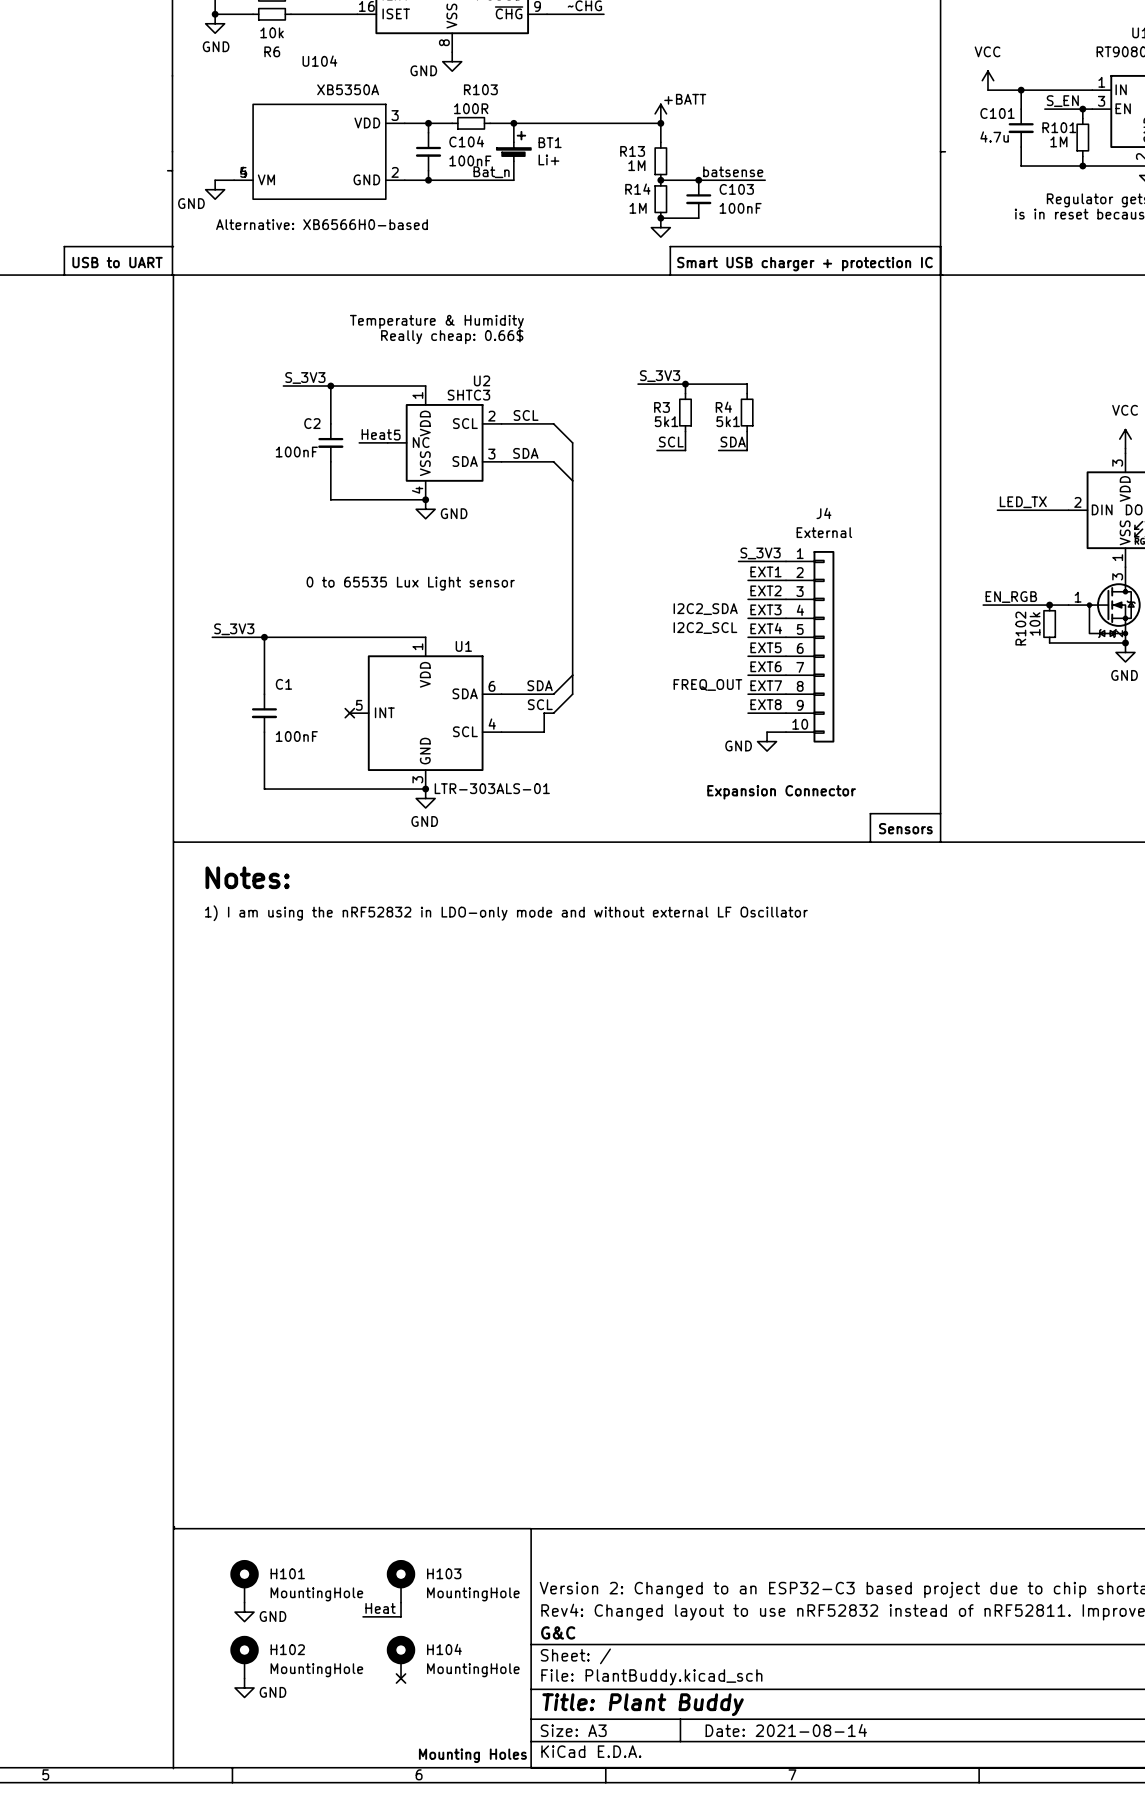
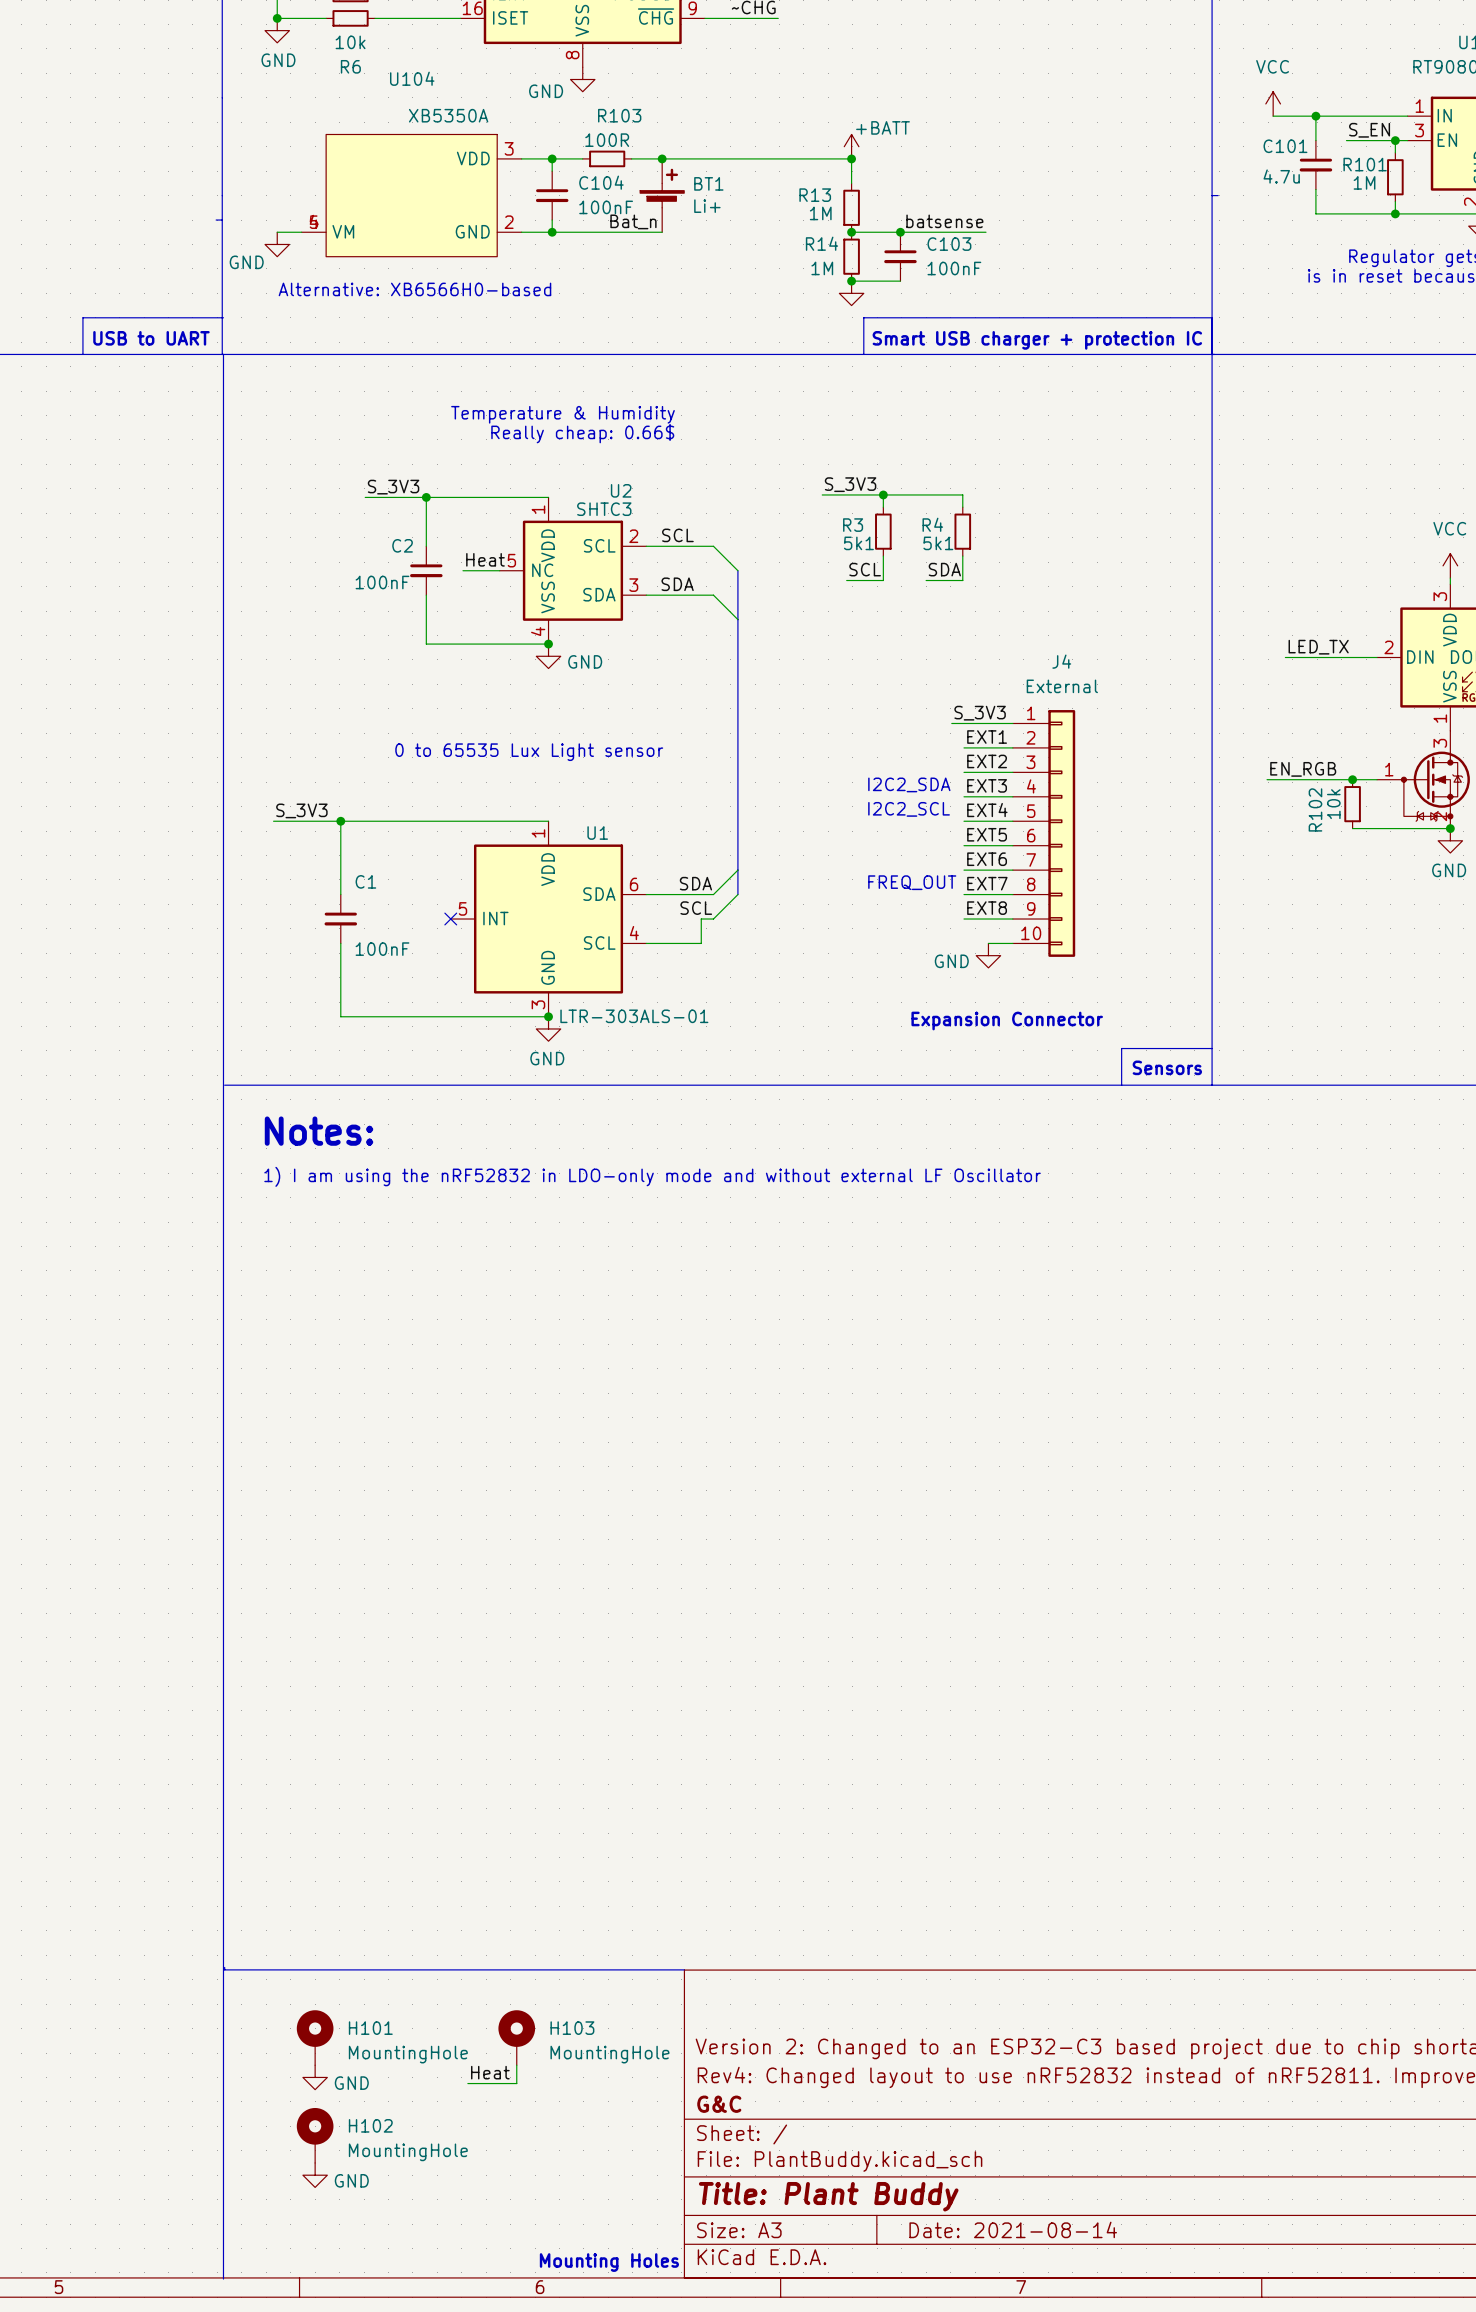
H104: MountingHole (401, 1657) -> none
no-connect mark: (401, 1678) -> none

